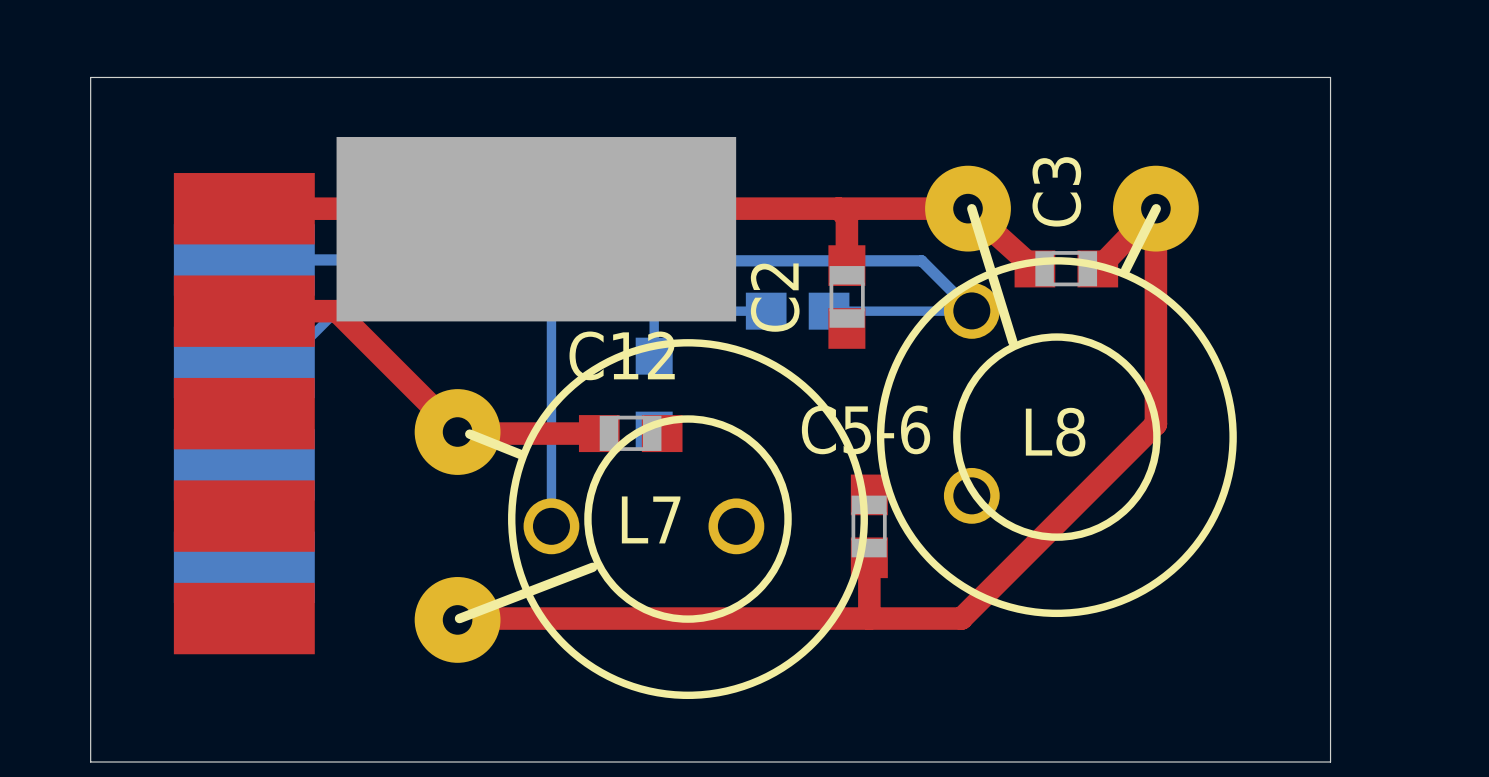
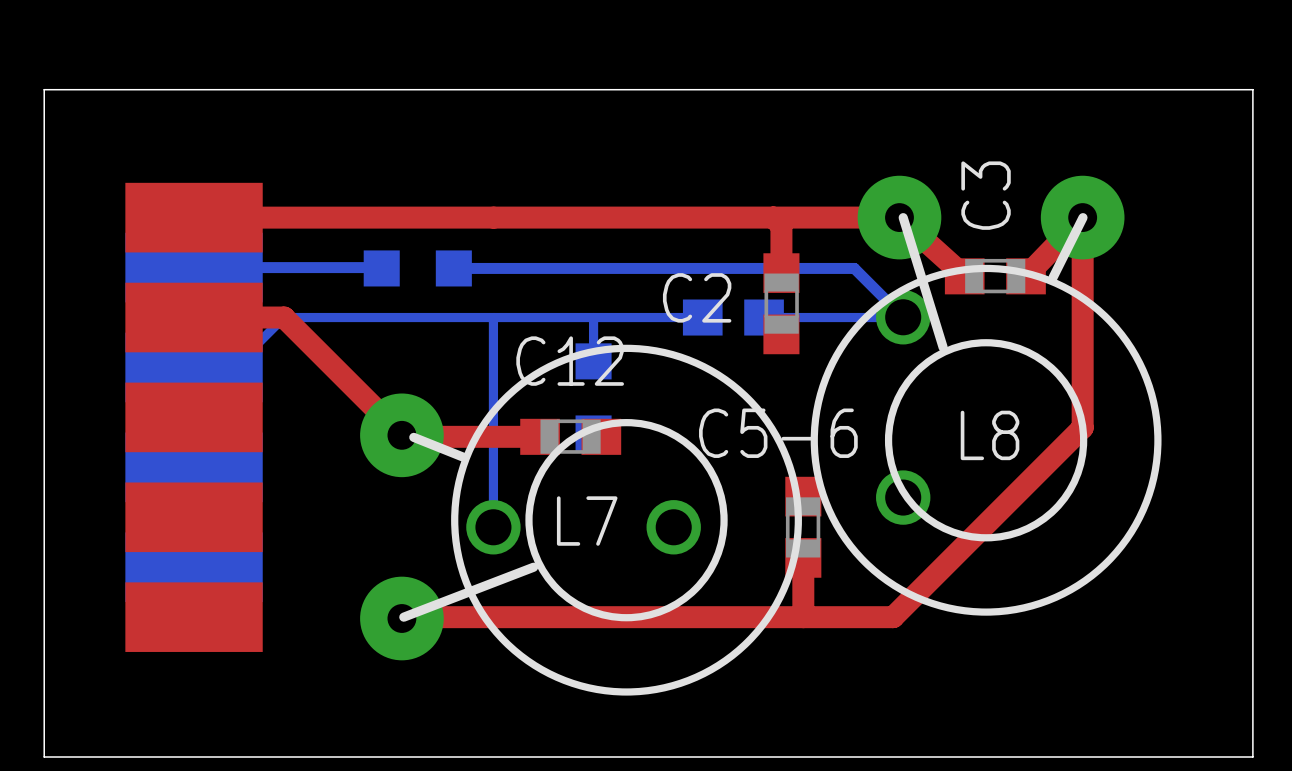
drawing: [336, 136, 737, 322] -> none
C2 name rotation: 0° (775, 297) -> 90° clockwise (697, 297)

